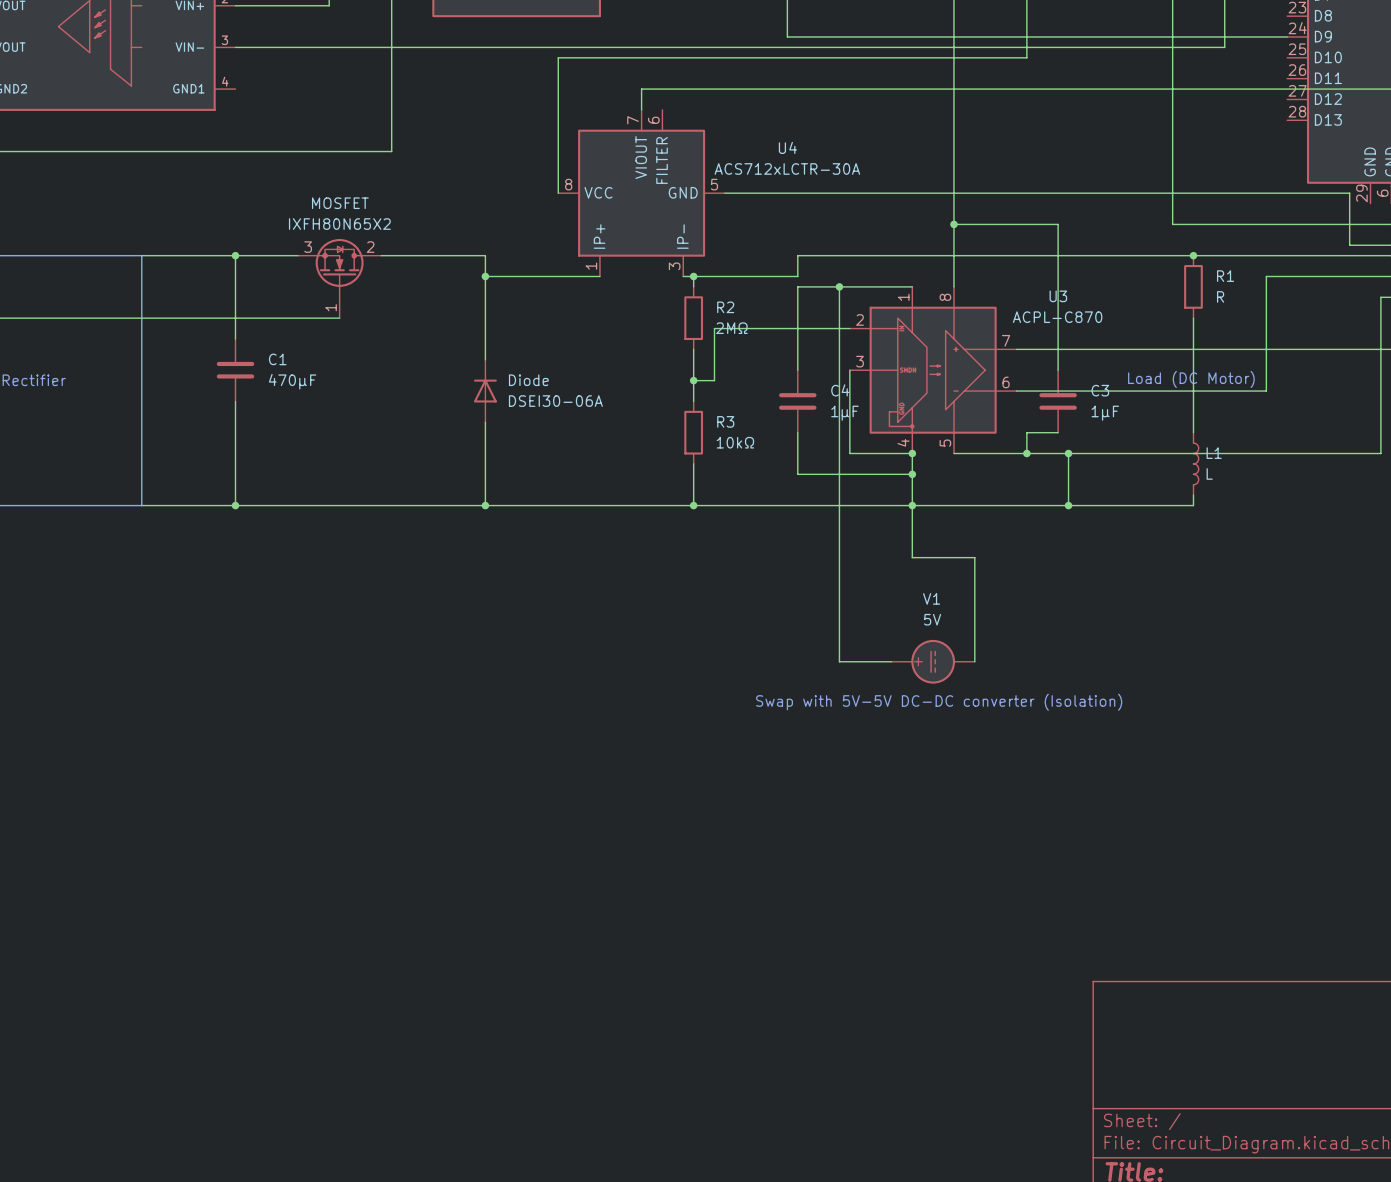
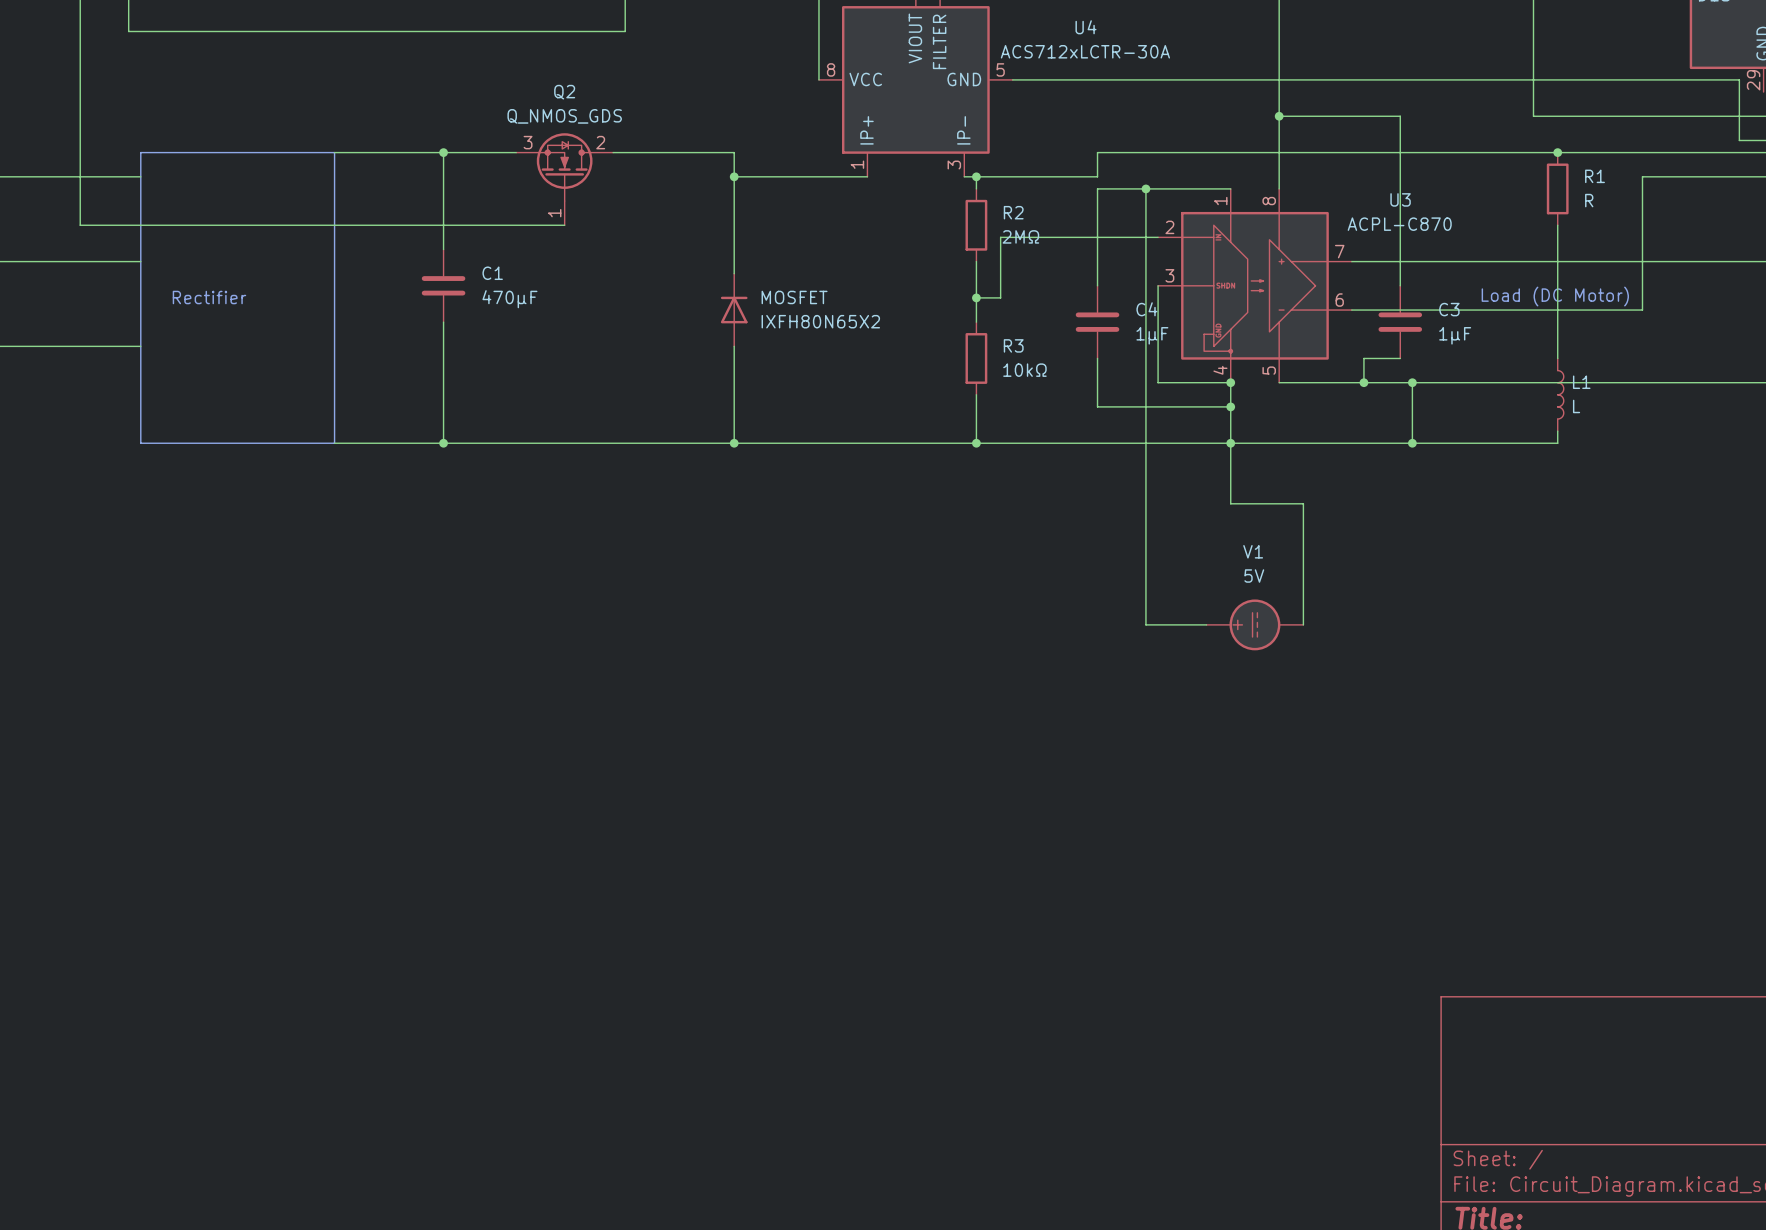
MOSFET name: MOSFET (340, 203) -> Q2 (564, 92)
MOSFET value: IXFH80N65X2 (339, 224) -> Q_NMOS_GDS (564, 116)
Diode name: Diode (528, 380) -> MOSFET (794, 297)
Diode value: DSEI30-06A (555, 401) -> IXFH80N65X2 (820, 321)
text: Swap with 5V-5V DC-DC converter (Isolation) (939, 702) -> none

